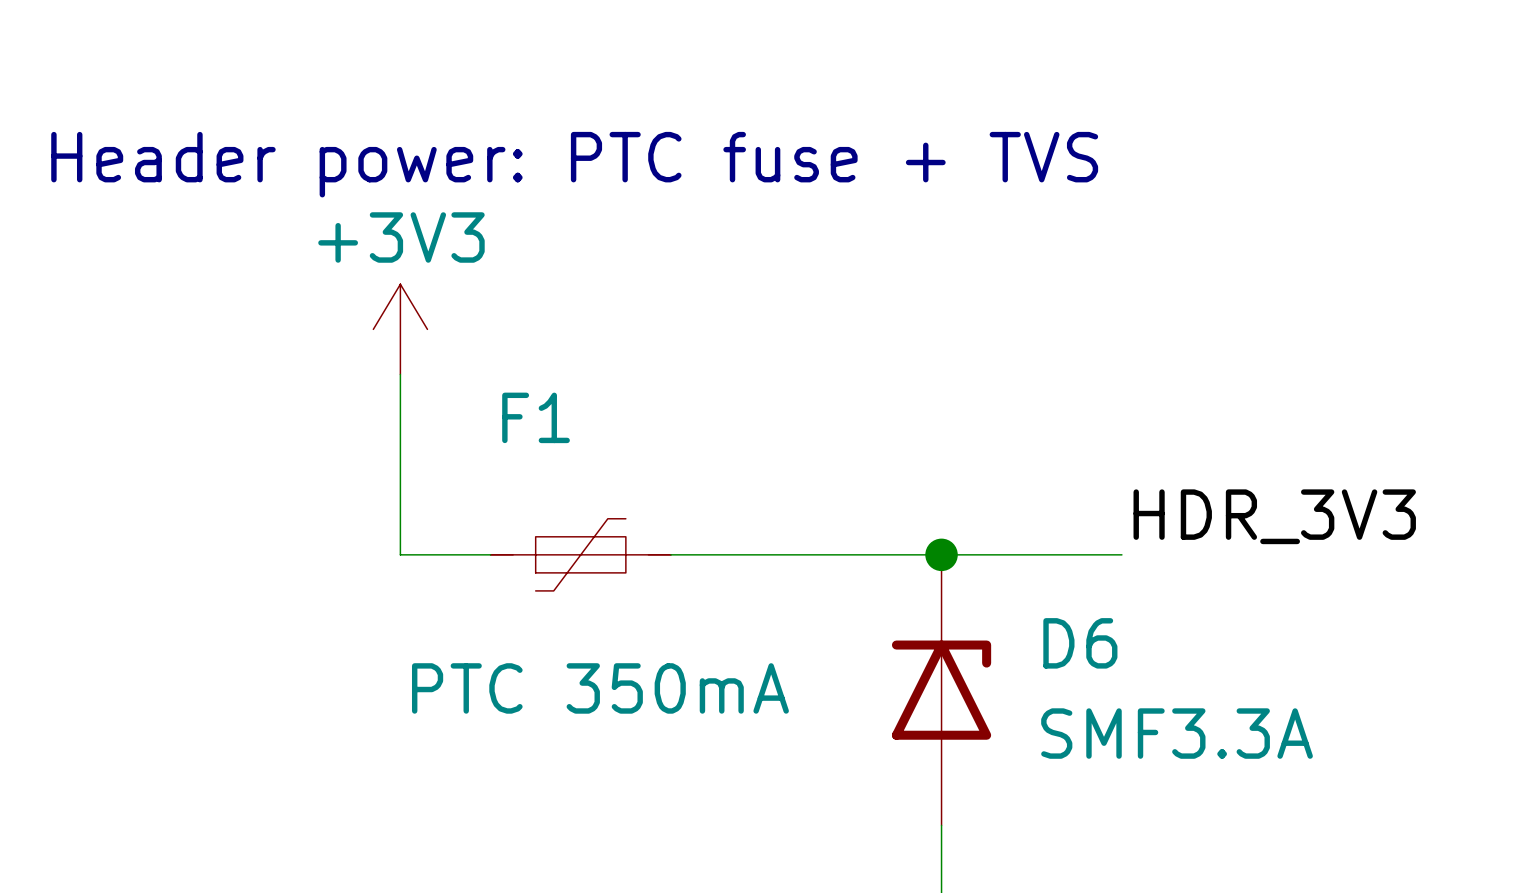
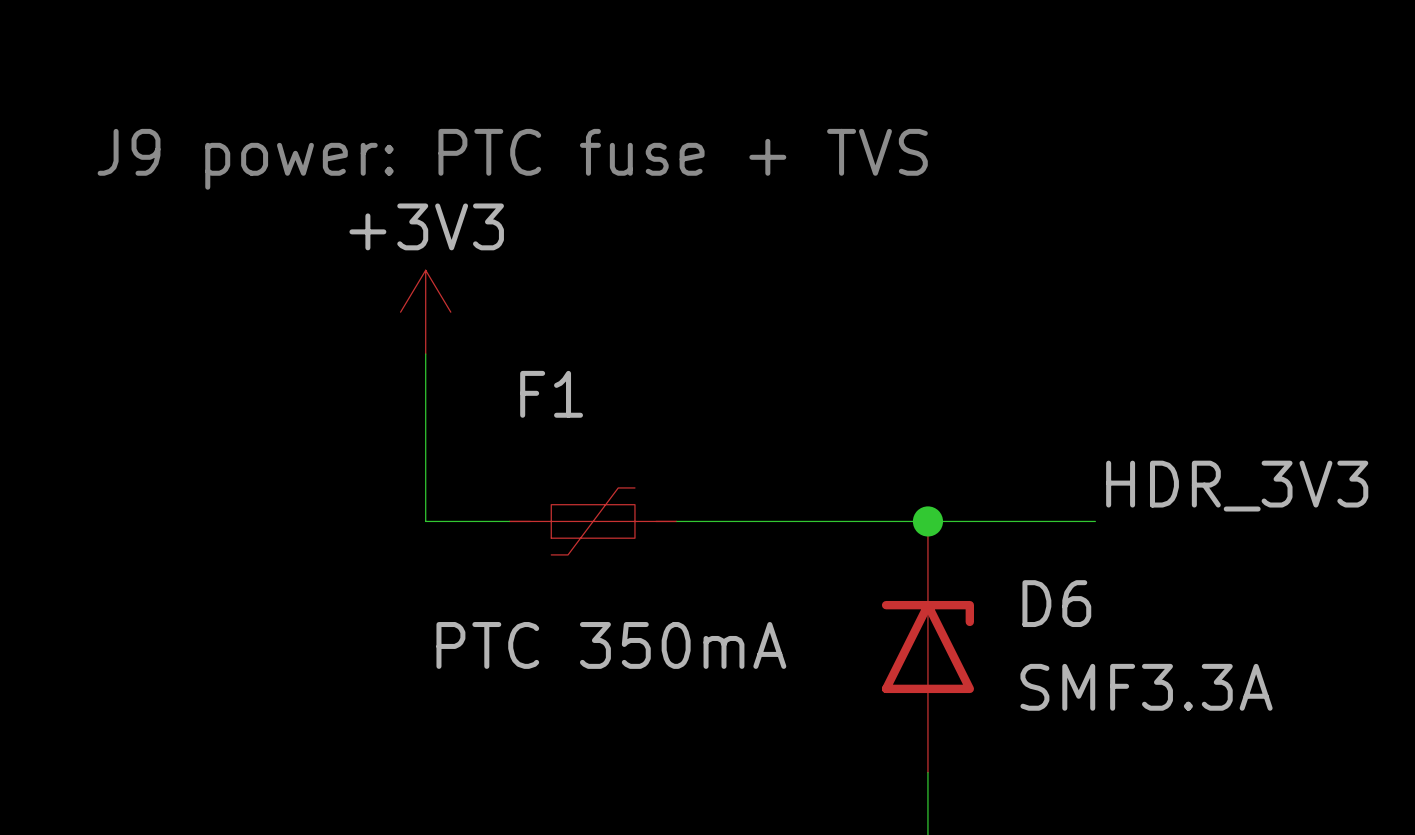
text: Header power: PTC fuse + TVS (574, 164) -> J9 power: PTC fuse + TVS (512, 159)

